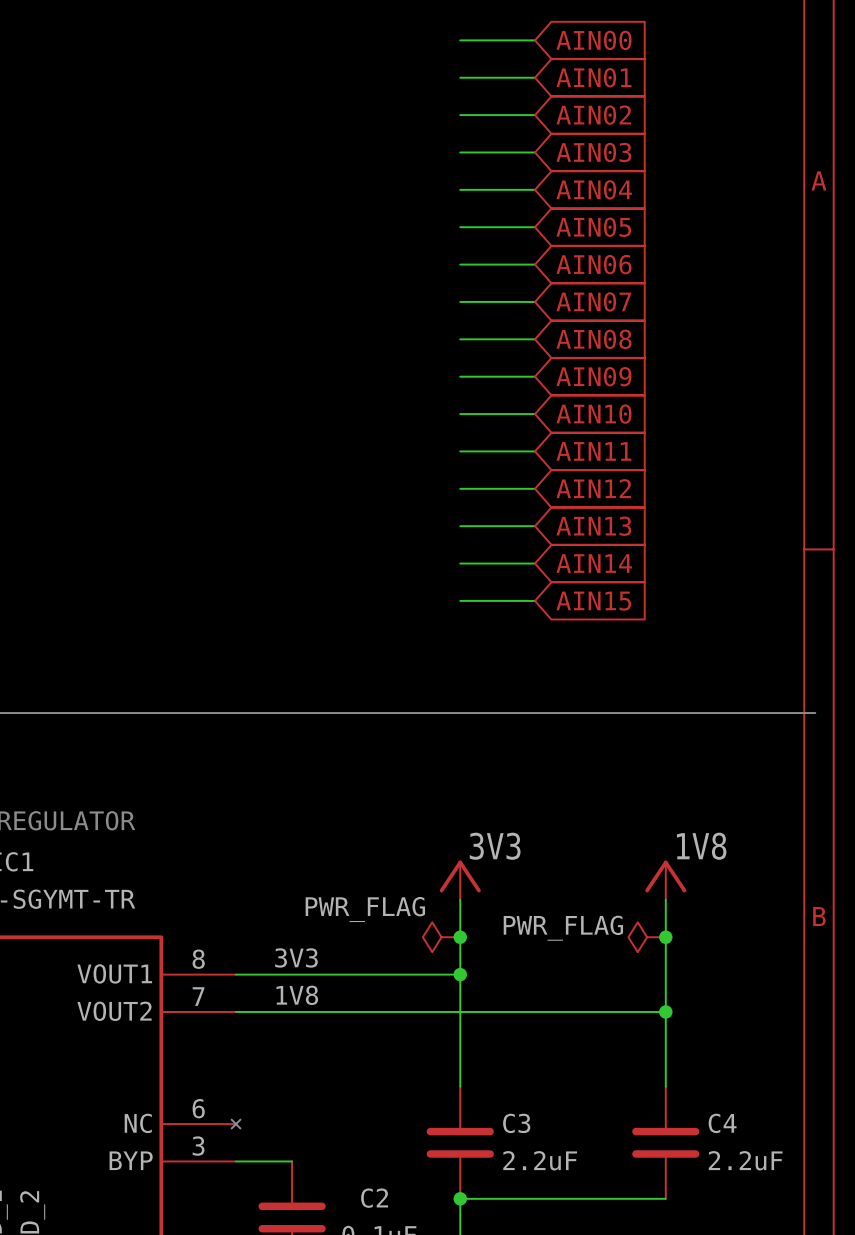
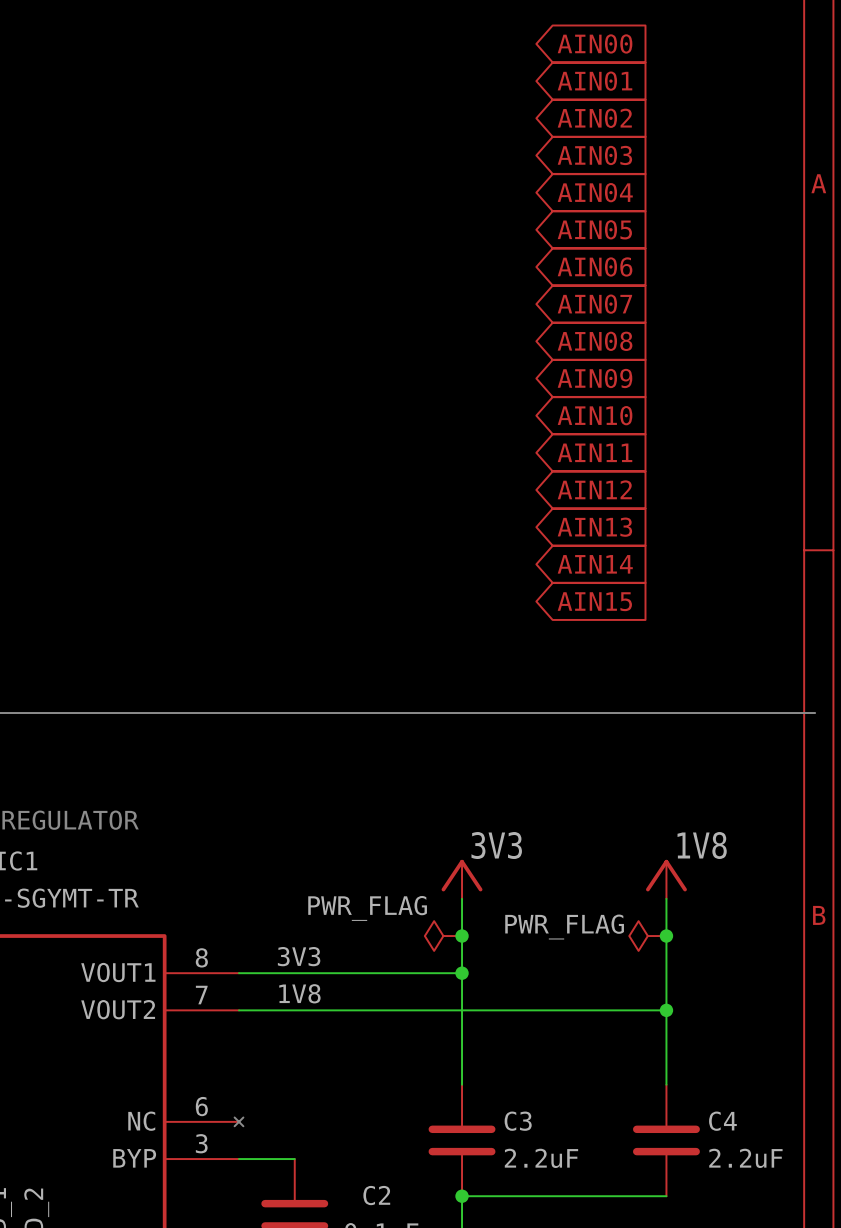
wire: (460, 40) (535, 40) -> none
wire: (460, 77) (535, 77) -> none
wire: (460, 115) (535, 115) -> none
wire: (460, 152) (535, 152) -> none
wire: (460, 189) (535, 189) -> none
wire: (460, 227) (535, 227) -> none
wire: (460, 264) (535, 264) -> none
wire: (460, 301) (535, 301) -> none
wire: (460, 339) (535, 339) -> none
wire: (460, 376) (535, 376) -> none
wire: (460, 414) (535, 414) -> none
wire: (460, 451) (535, 451) -> none
wire: (460, 488) (535, 488) -> none
wire: (460, 526) (535, 526) -> none
wire: (460, 563) (535, 563) -> none
wire: (460, 600) (535, 600) -> none

